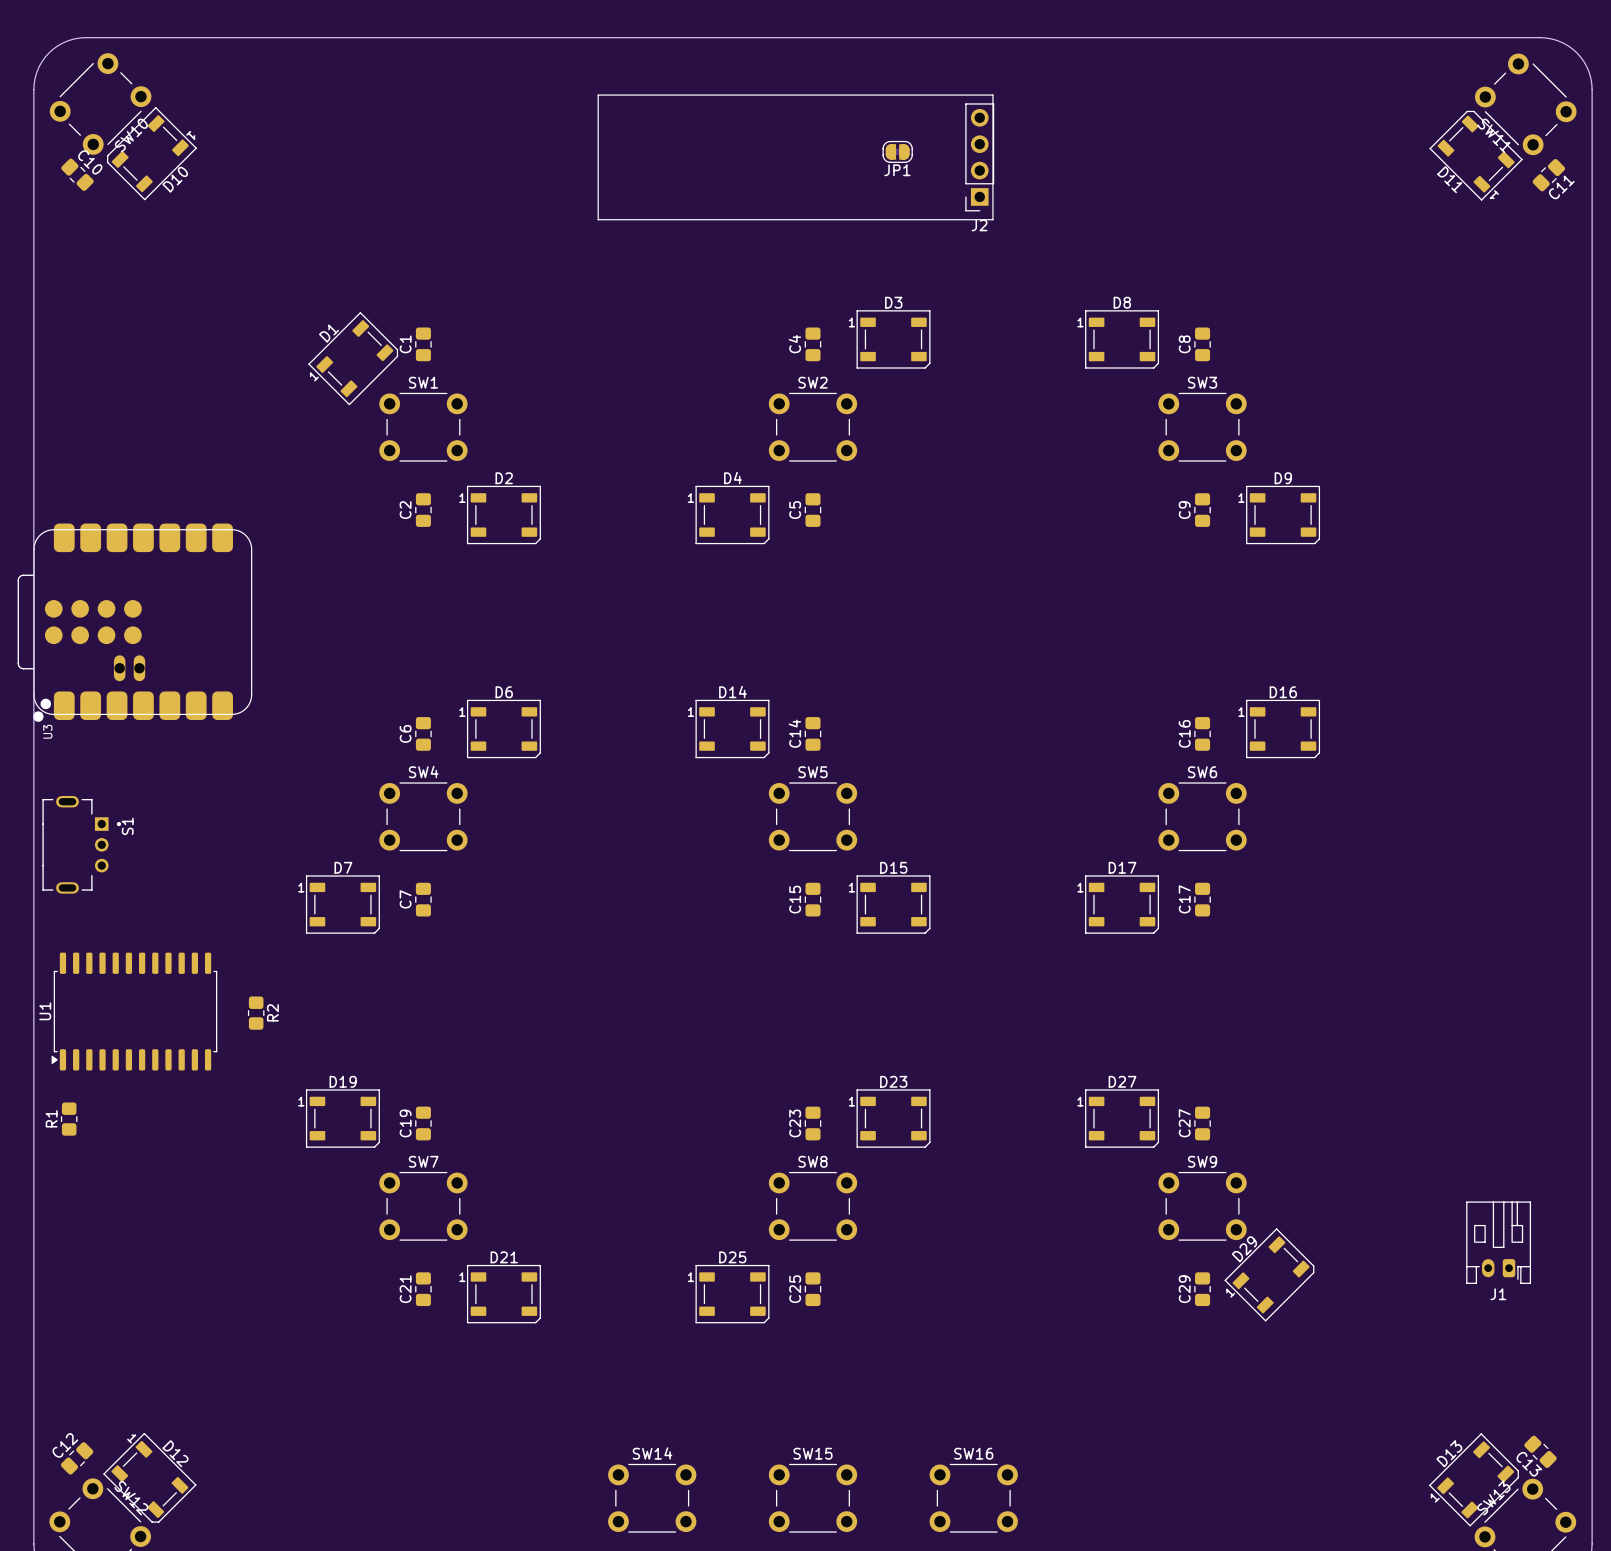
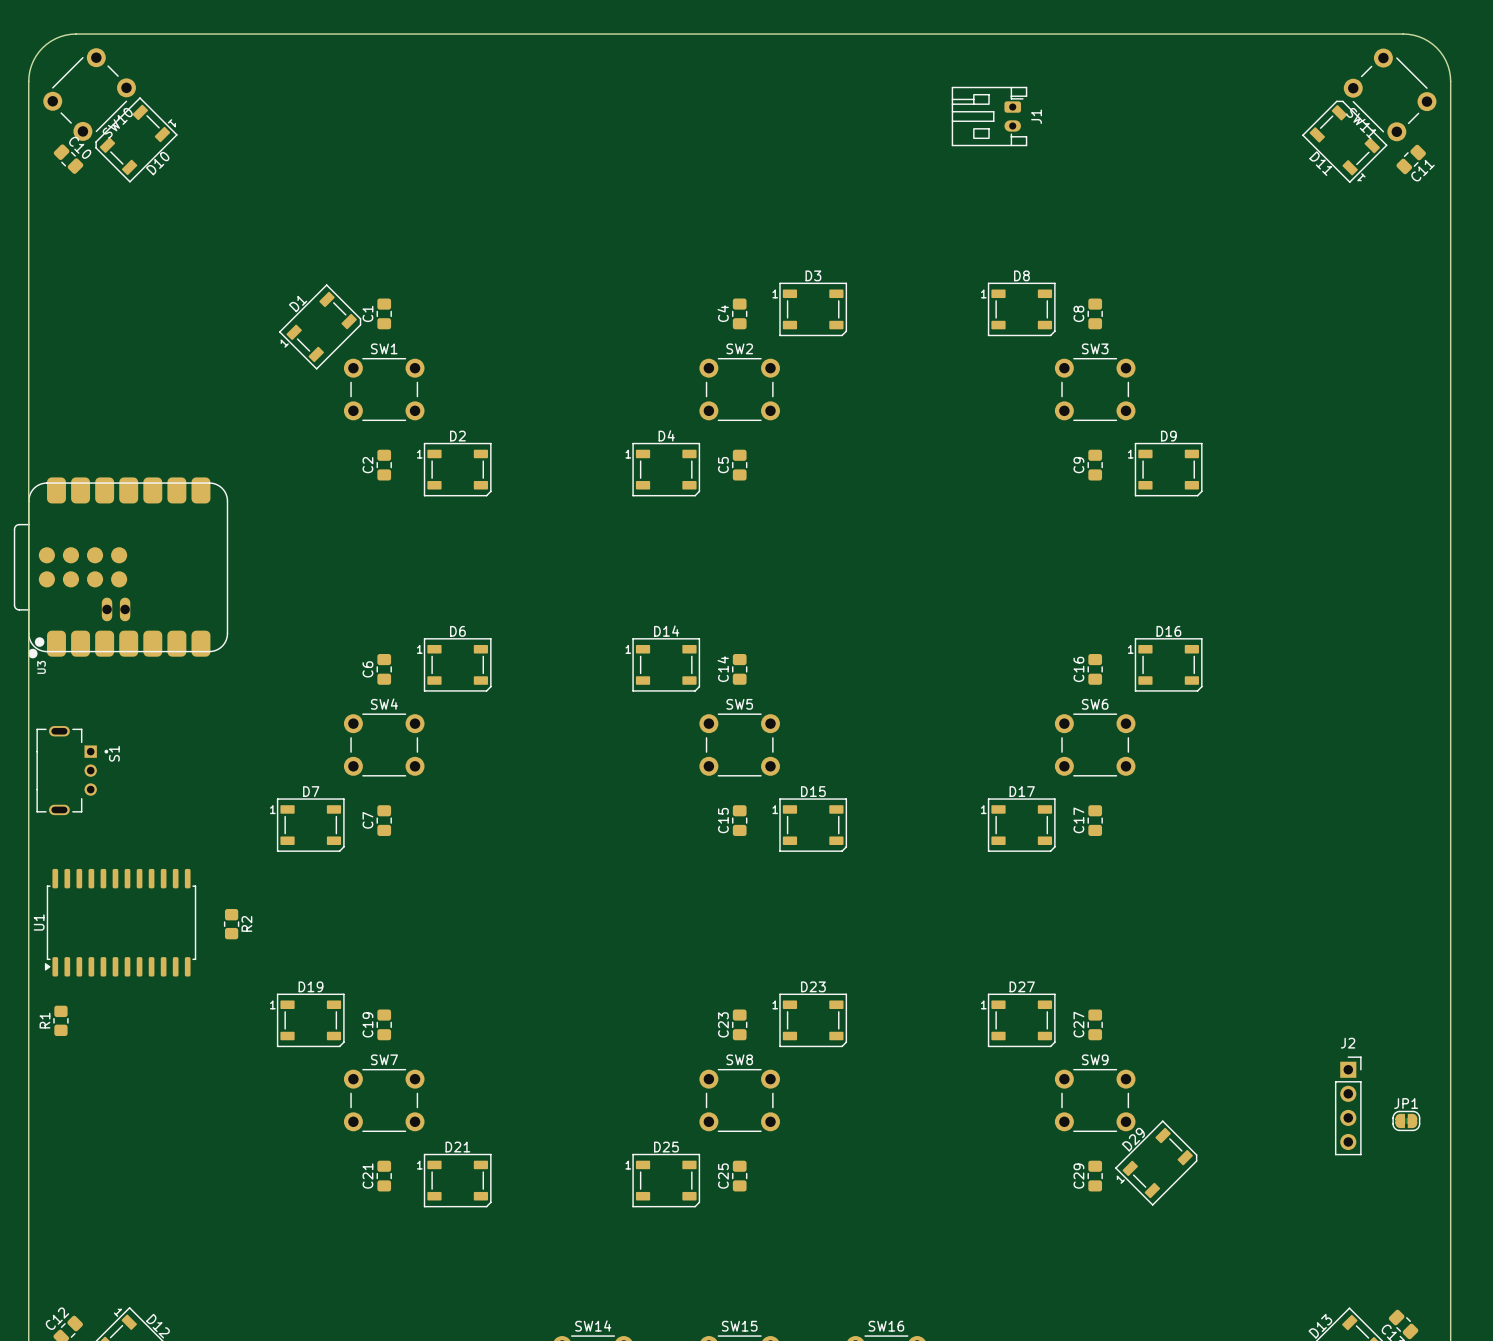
line: (598, 95) (992, 95) (992, 219) (598, 219) (598, 95) -> none
JP1 position: (897, 151) -> (1406, 1120)
J2 rotation: 0° (979, 157) -> 180° (1348, 1105)
J2 position: (979, 157) -> (1348, 1105)
JP1 name position: JP1 (897, 170) -> JP1 (1406, 1103)
J1 rotation: 0° (1498, 1242) -> 90° counterclockwise (989, 116)
J1 position: (1498, 1242) -> (989, 116)

